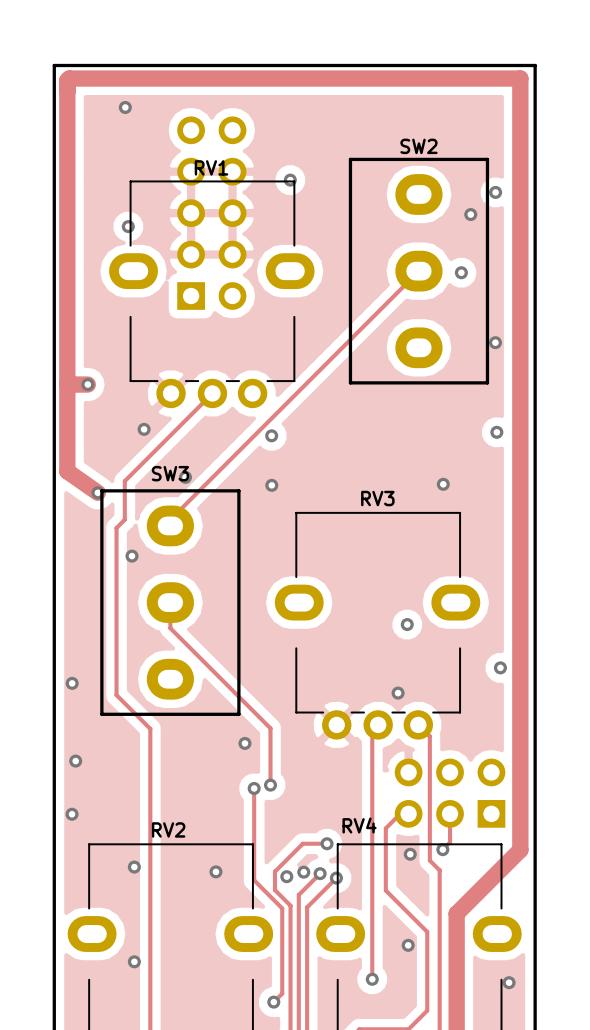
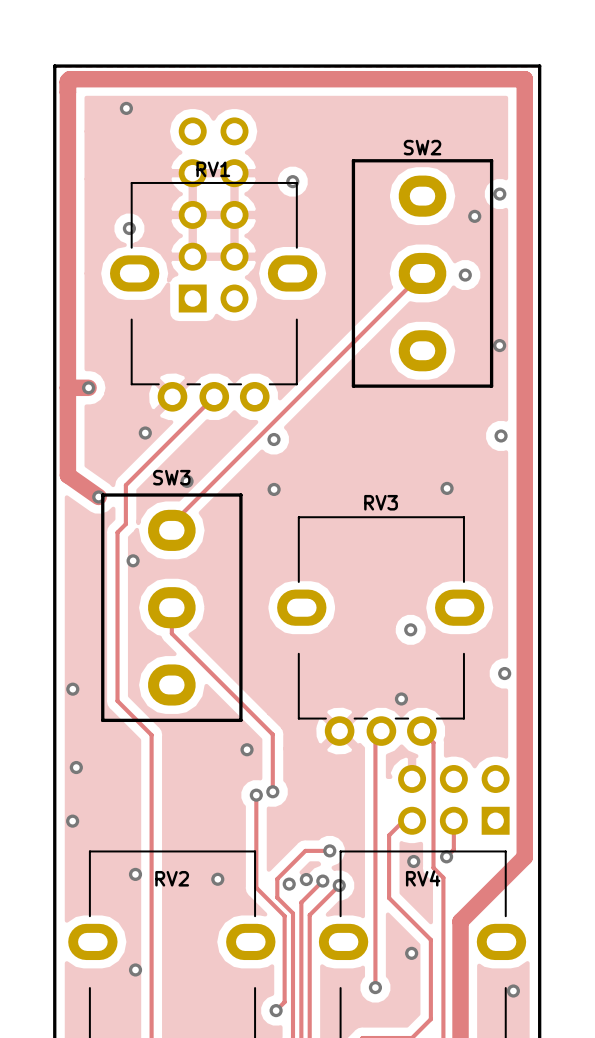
RV4 name position: RV4 (359, 825) -> RV4 (423, 878)
RV2 name position: RV2 (168, 829) -> RV2 (172, 878)

